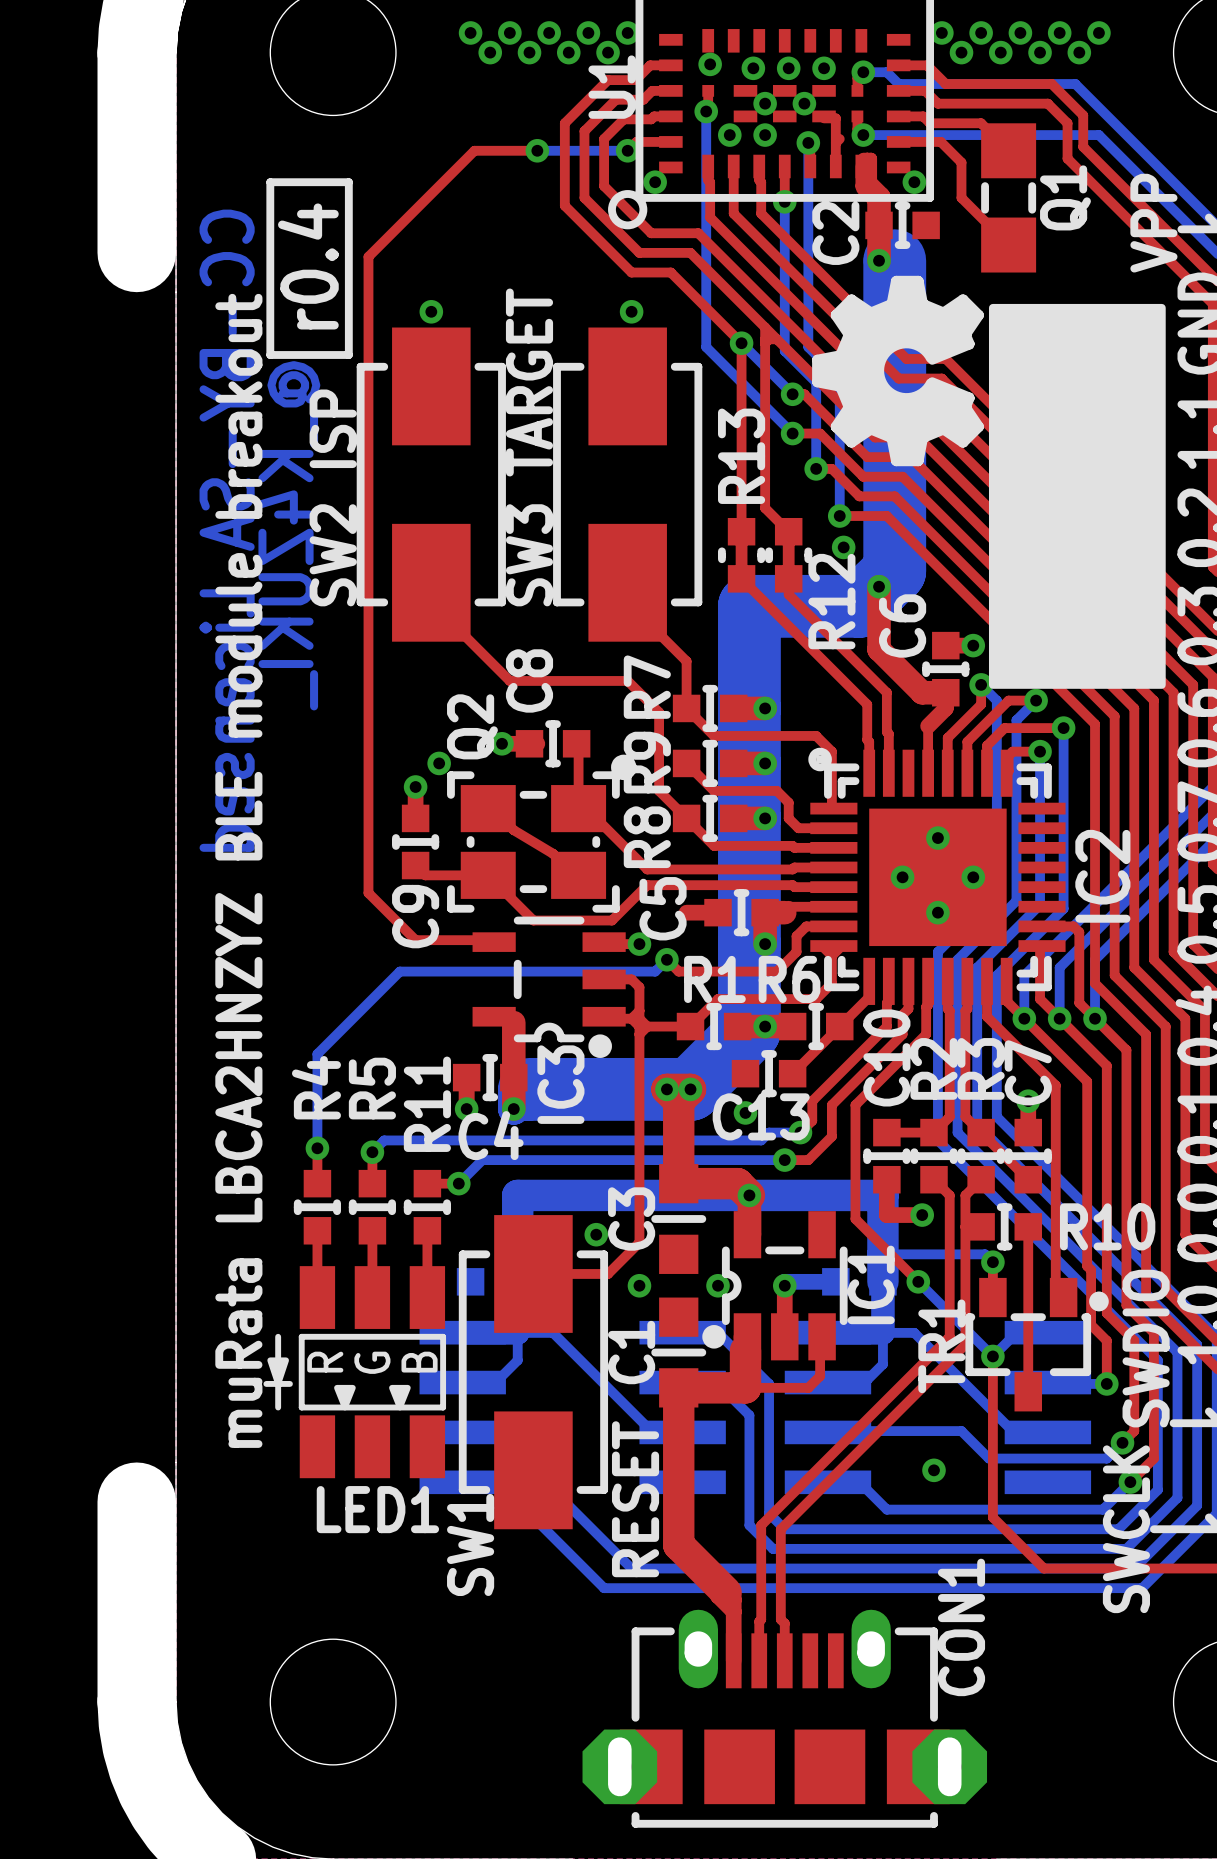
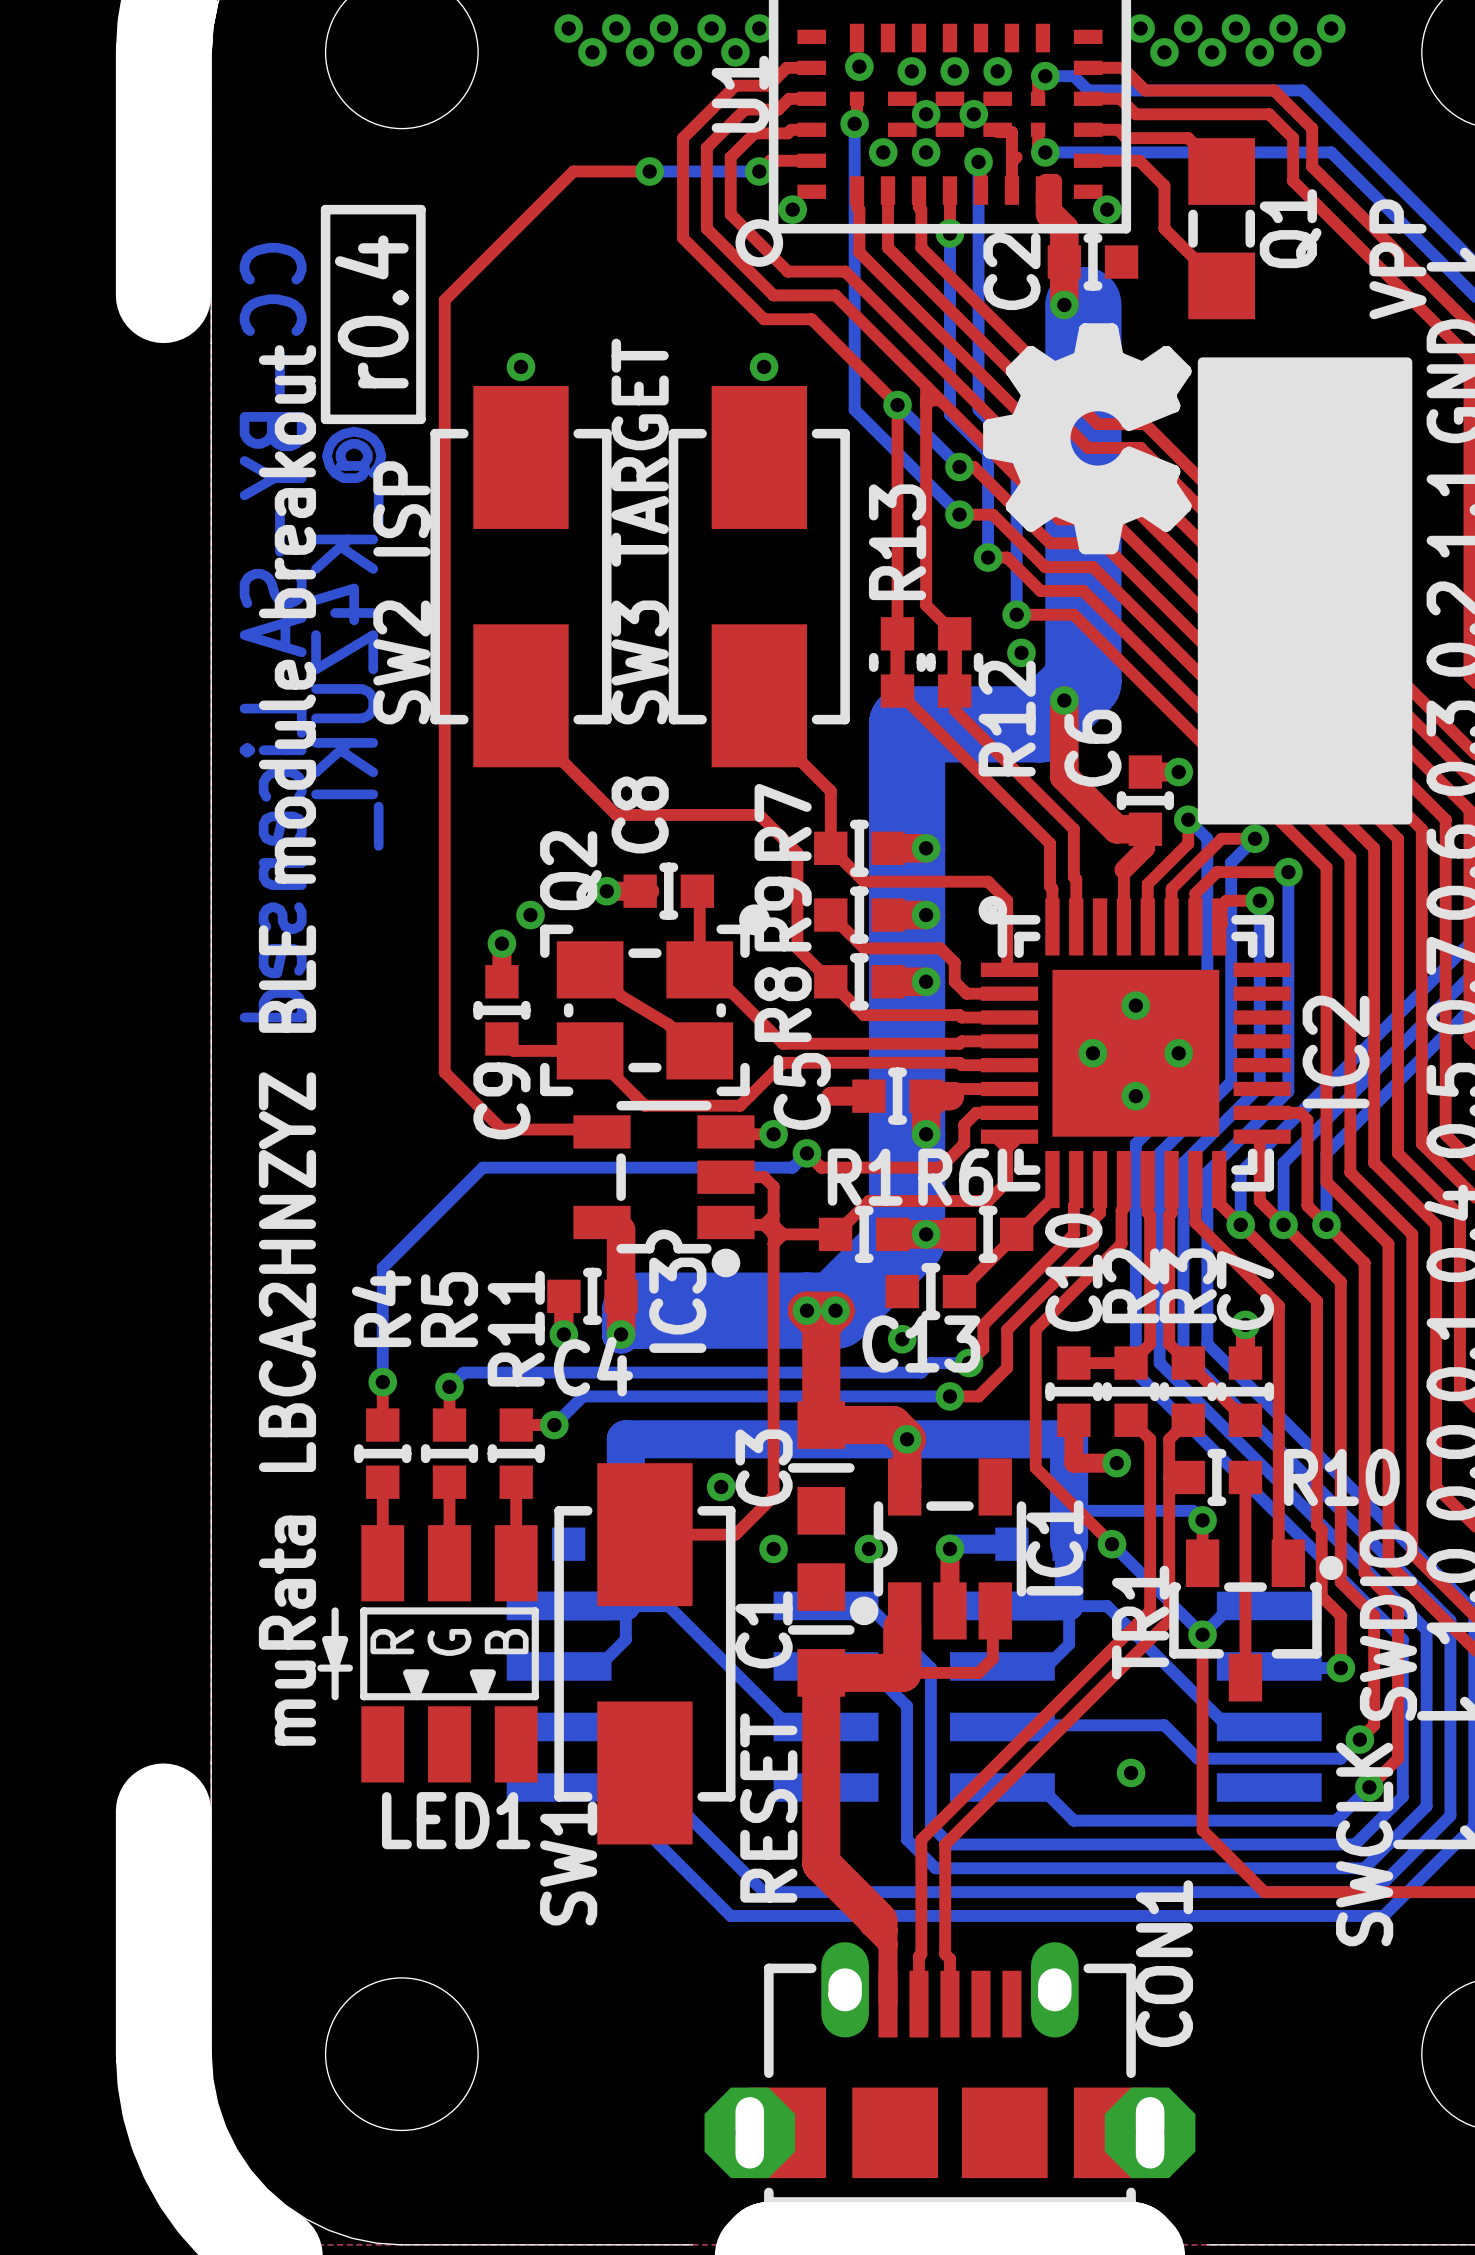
IC3 footprint: [472, 916, 626, 1058] -> [573, 1100, 755, 1278]

